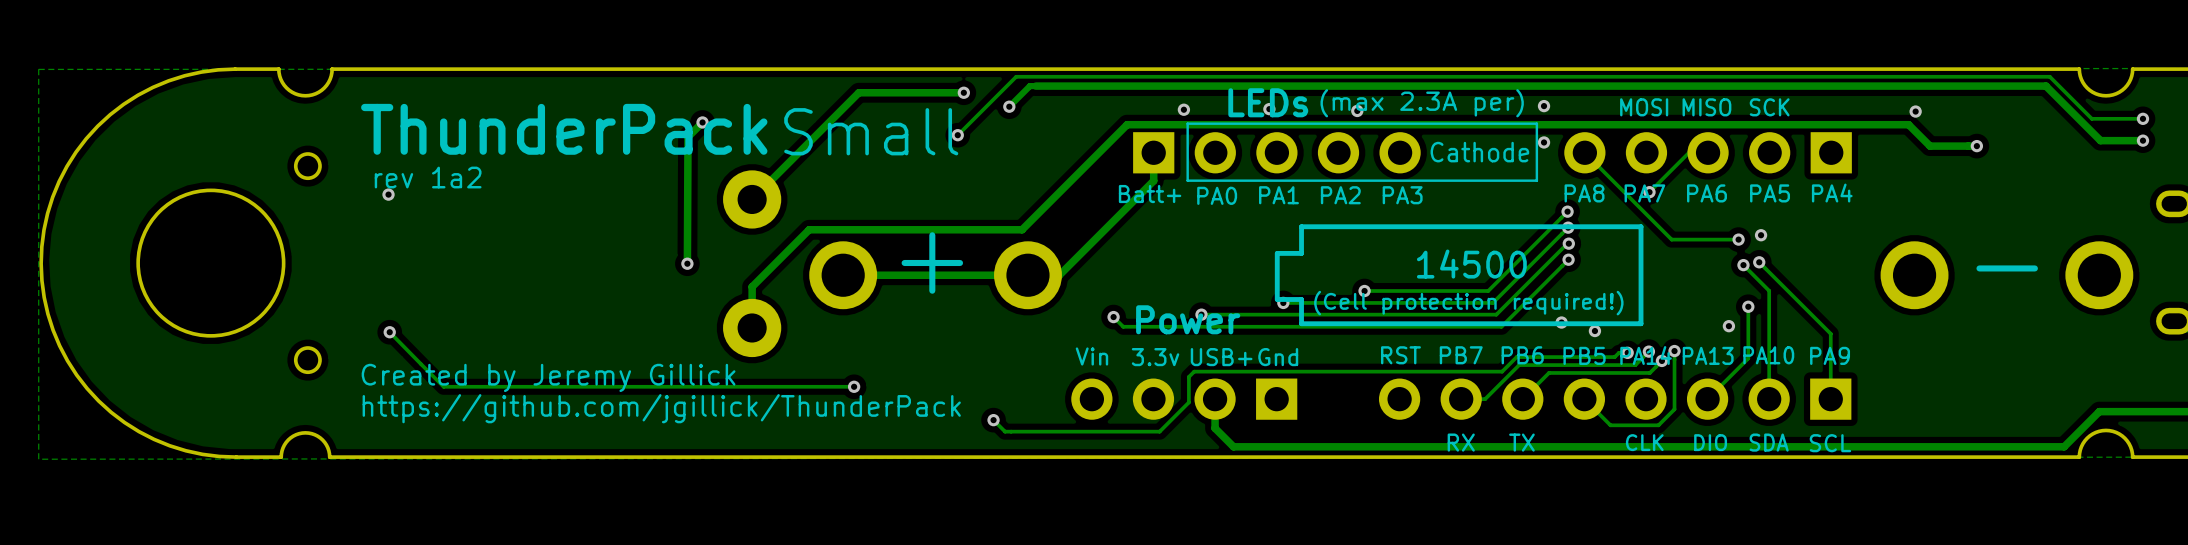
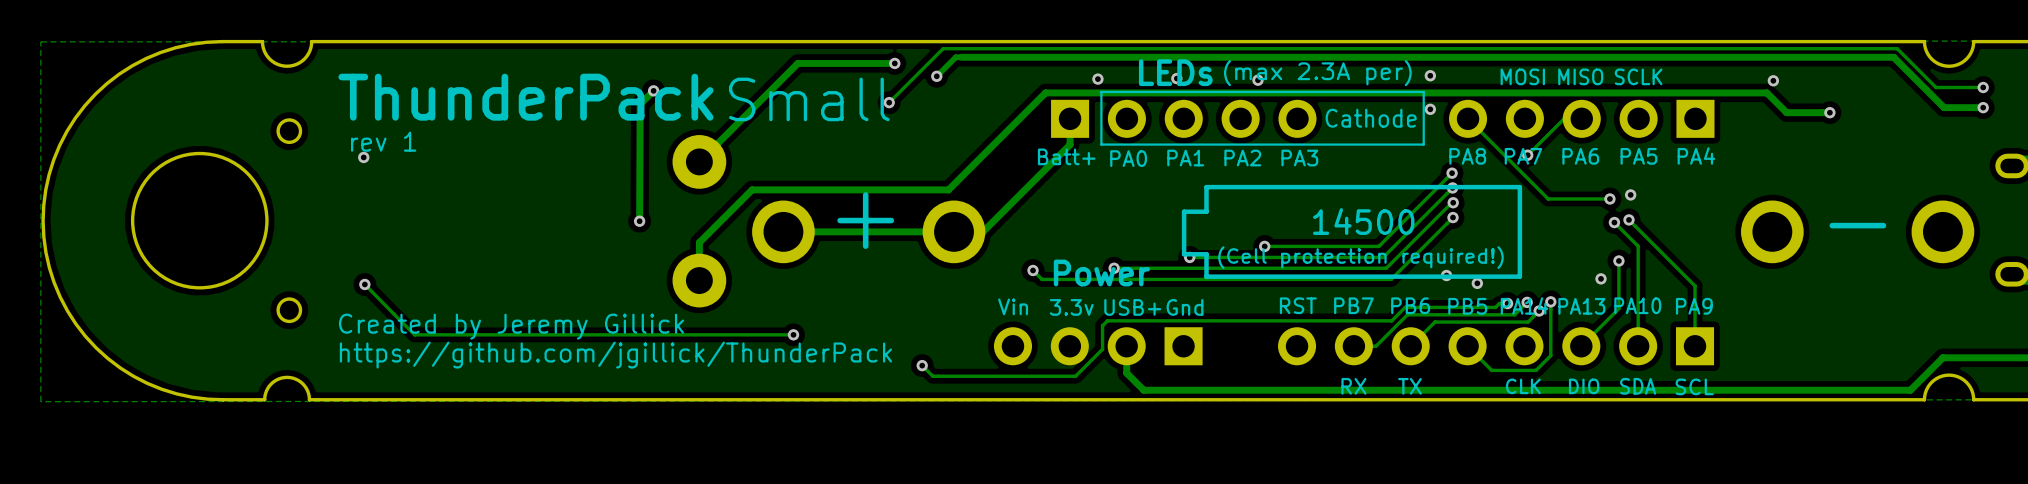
text: SCK (1769, 107) -> SCLK (1638, 76)
text: rev 1a2 (428, 177) -> rev 1 (383, 141)

